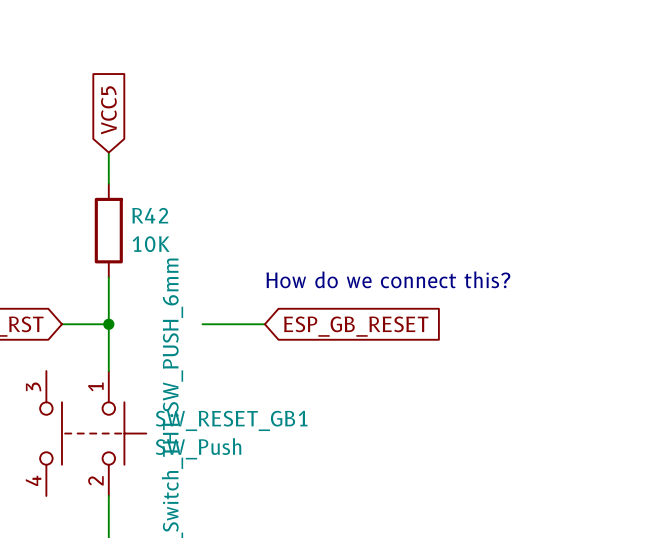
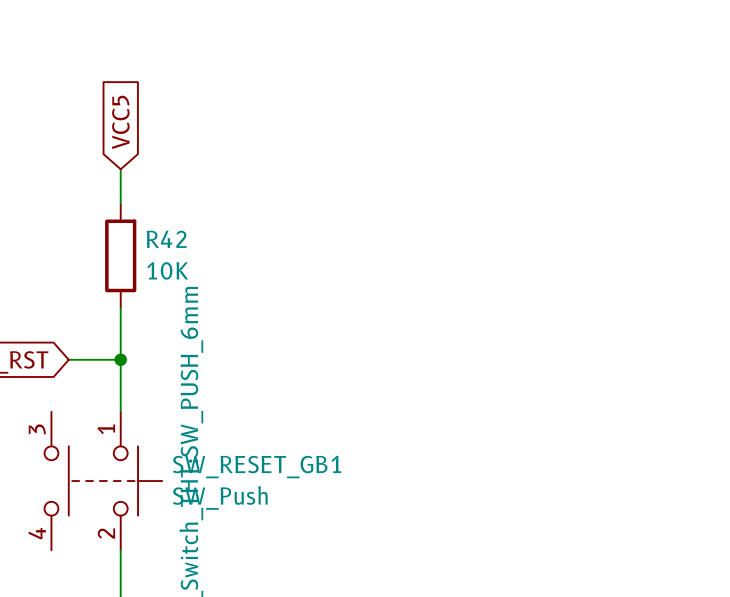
text: How do we connect this? (388, 279) -> none
wire: (202, 324) (264, 324) -> none
global label: ESP_GB_RESET (356, 326) -> none

